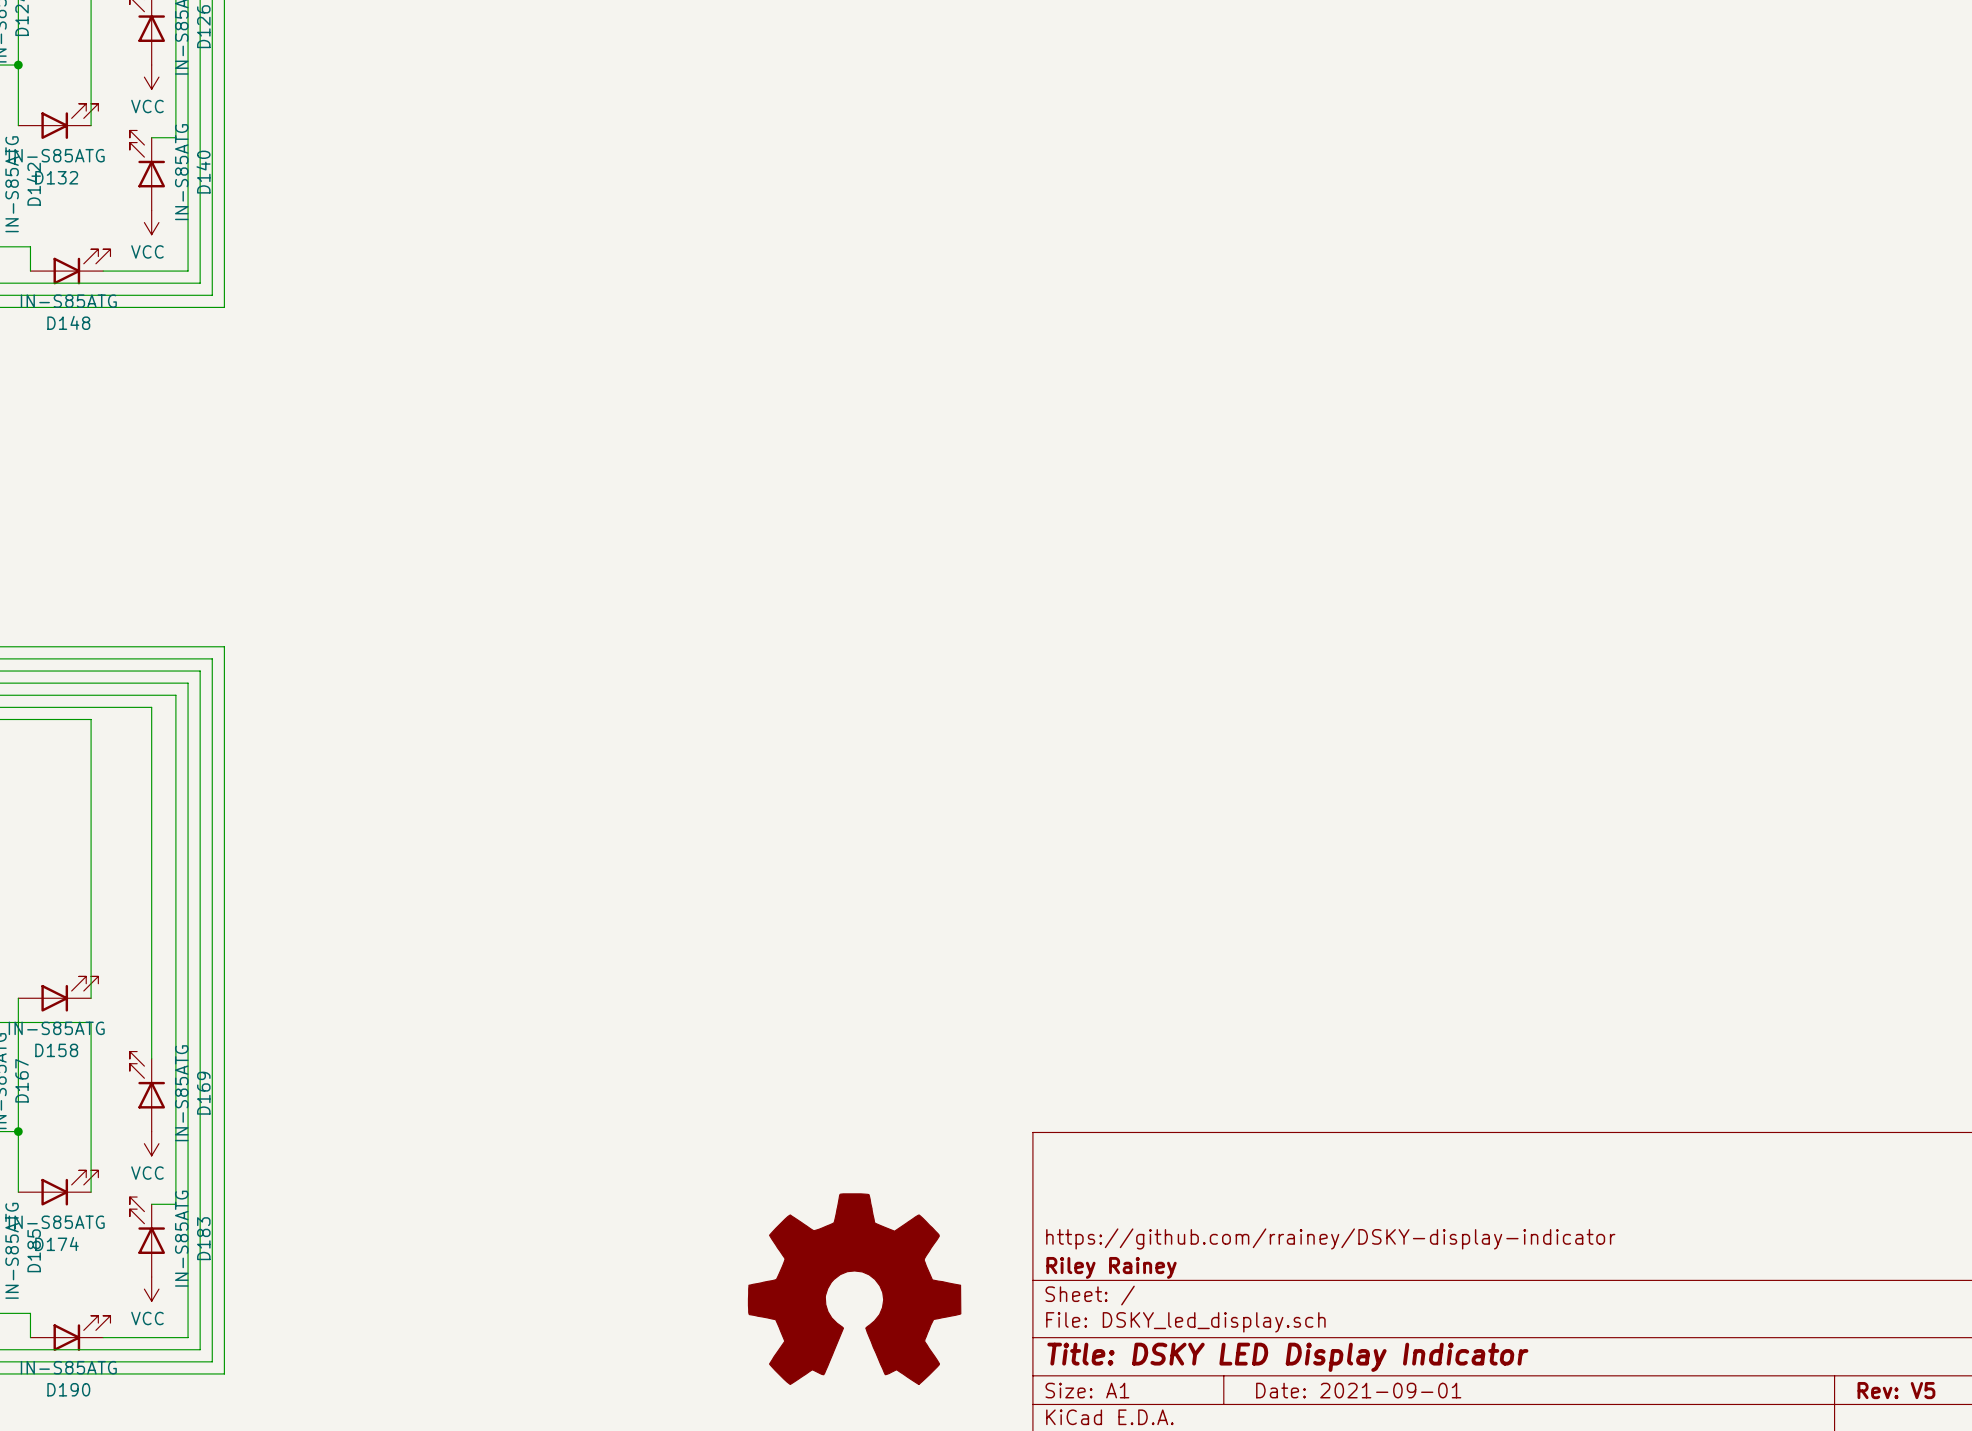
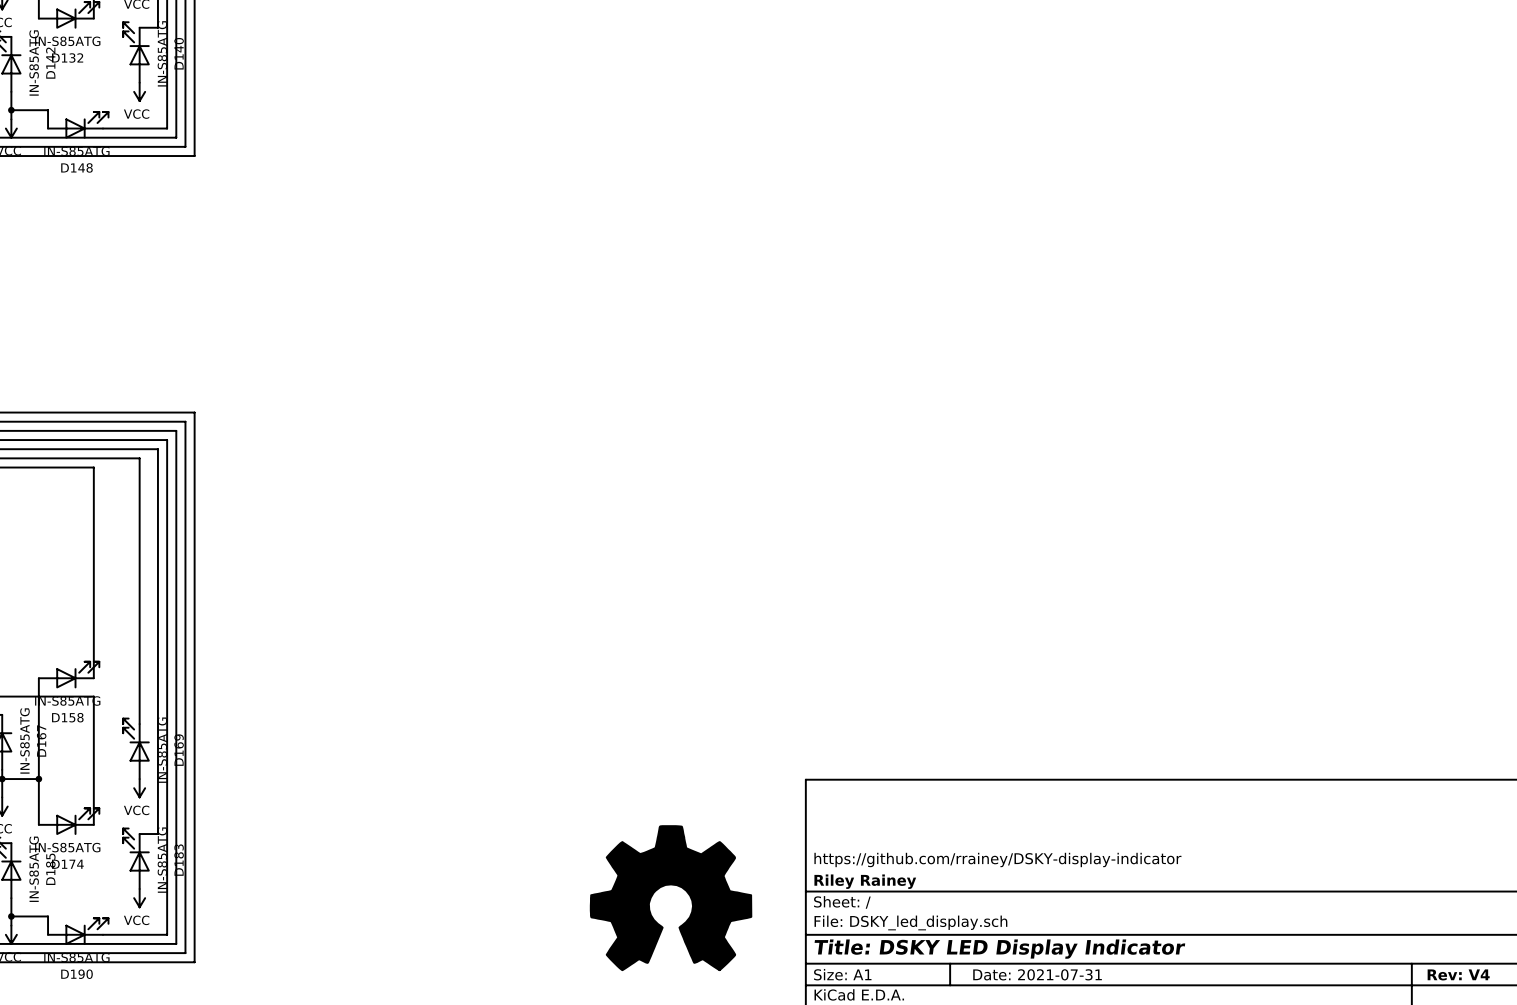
title block: Date: 2021-09-01 (1358, 1390) -> Date: 2021-07-31 (1037, 974)
title block: Rev: V5 (1896, 1390) -> Rev: V4 (1458, 974)

